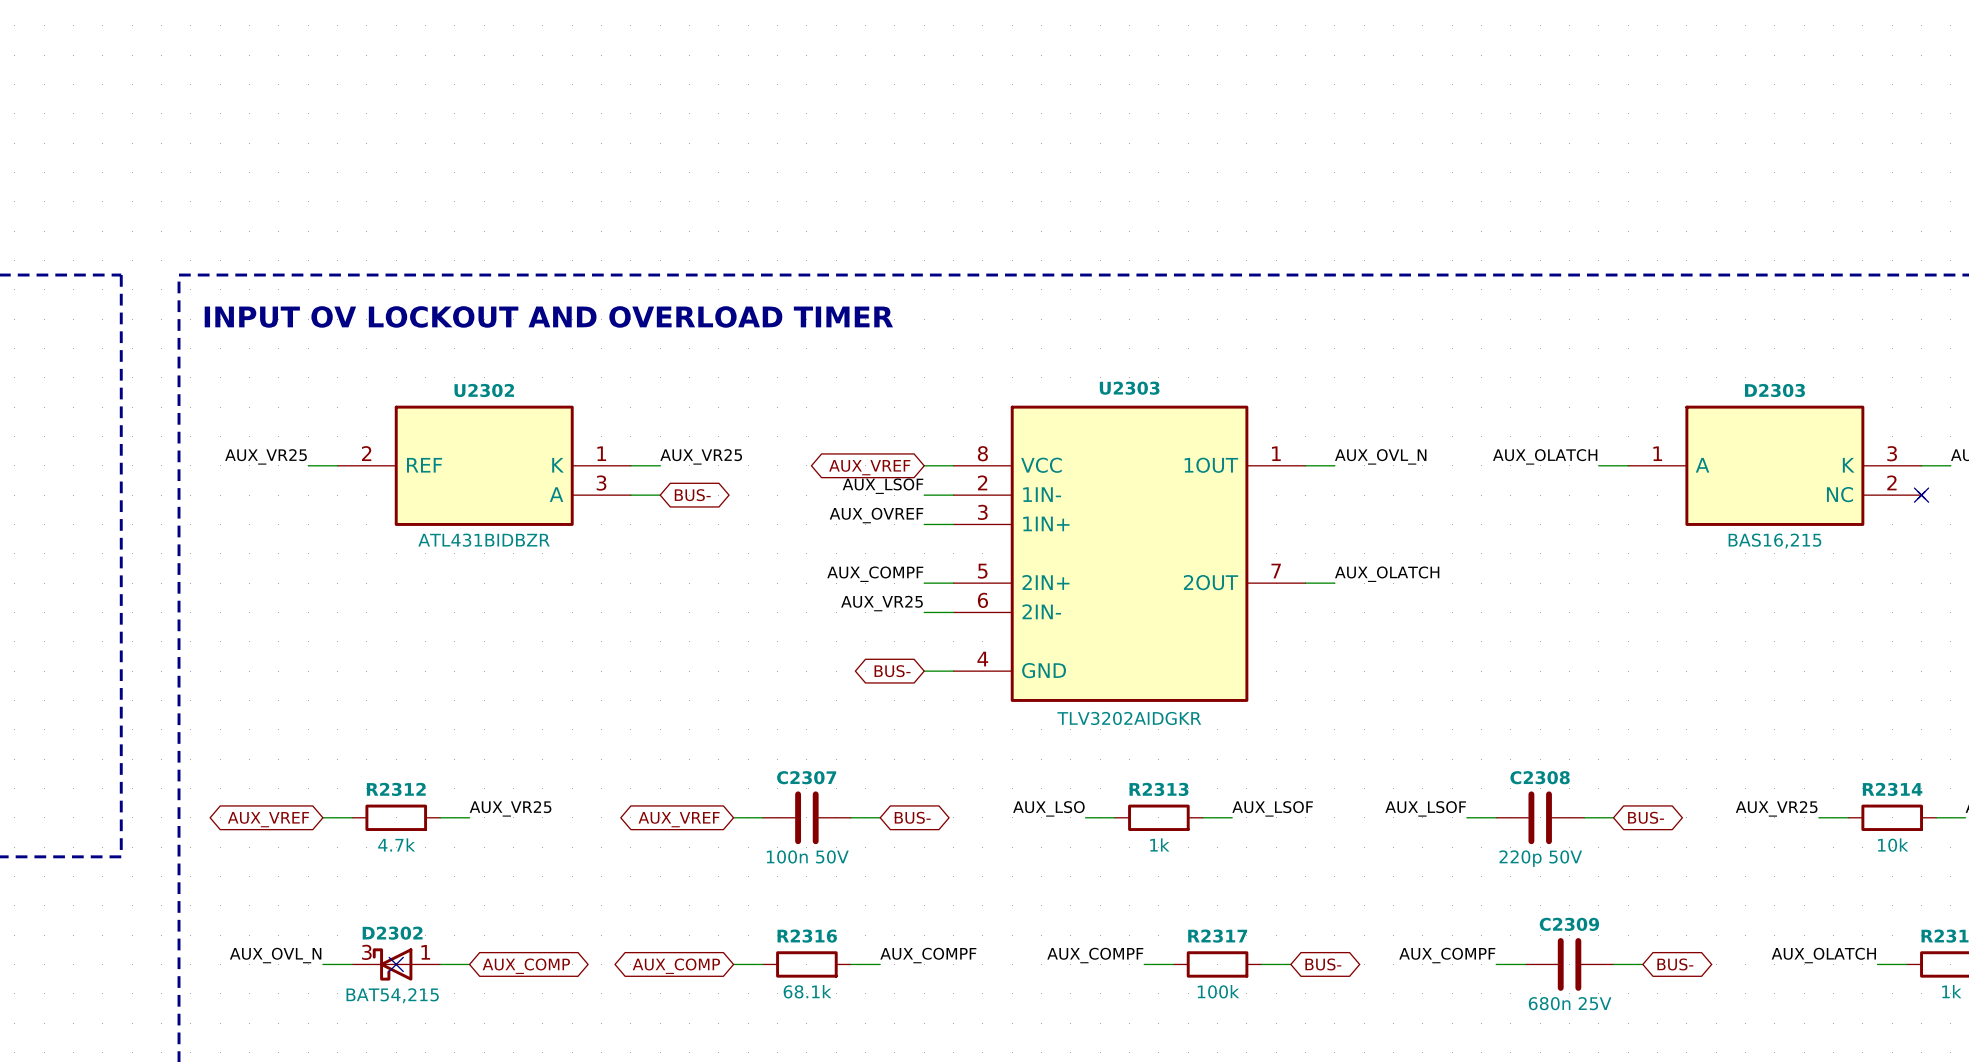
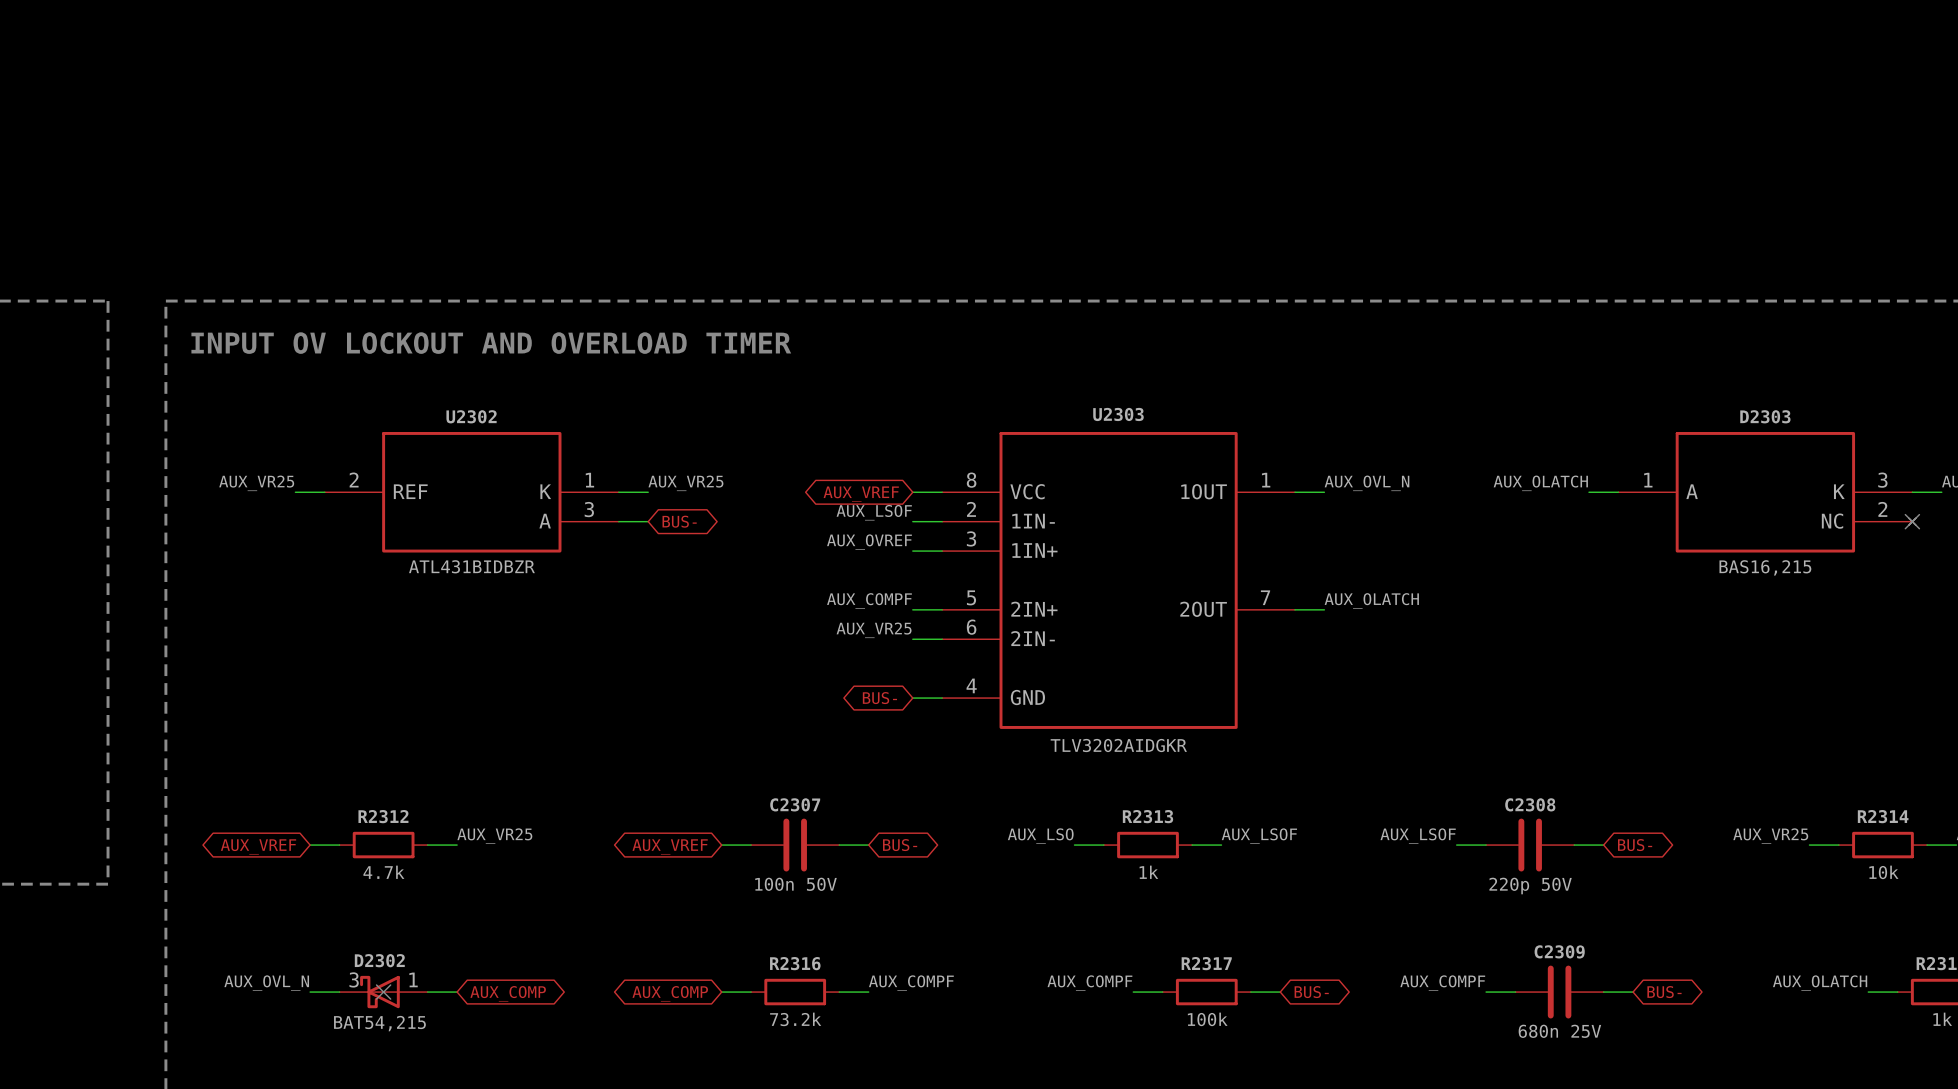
R2316 value: 68.1k (807, 991) -> 73.2k (795, 1019)

